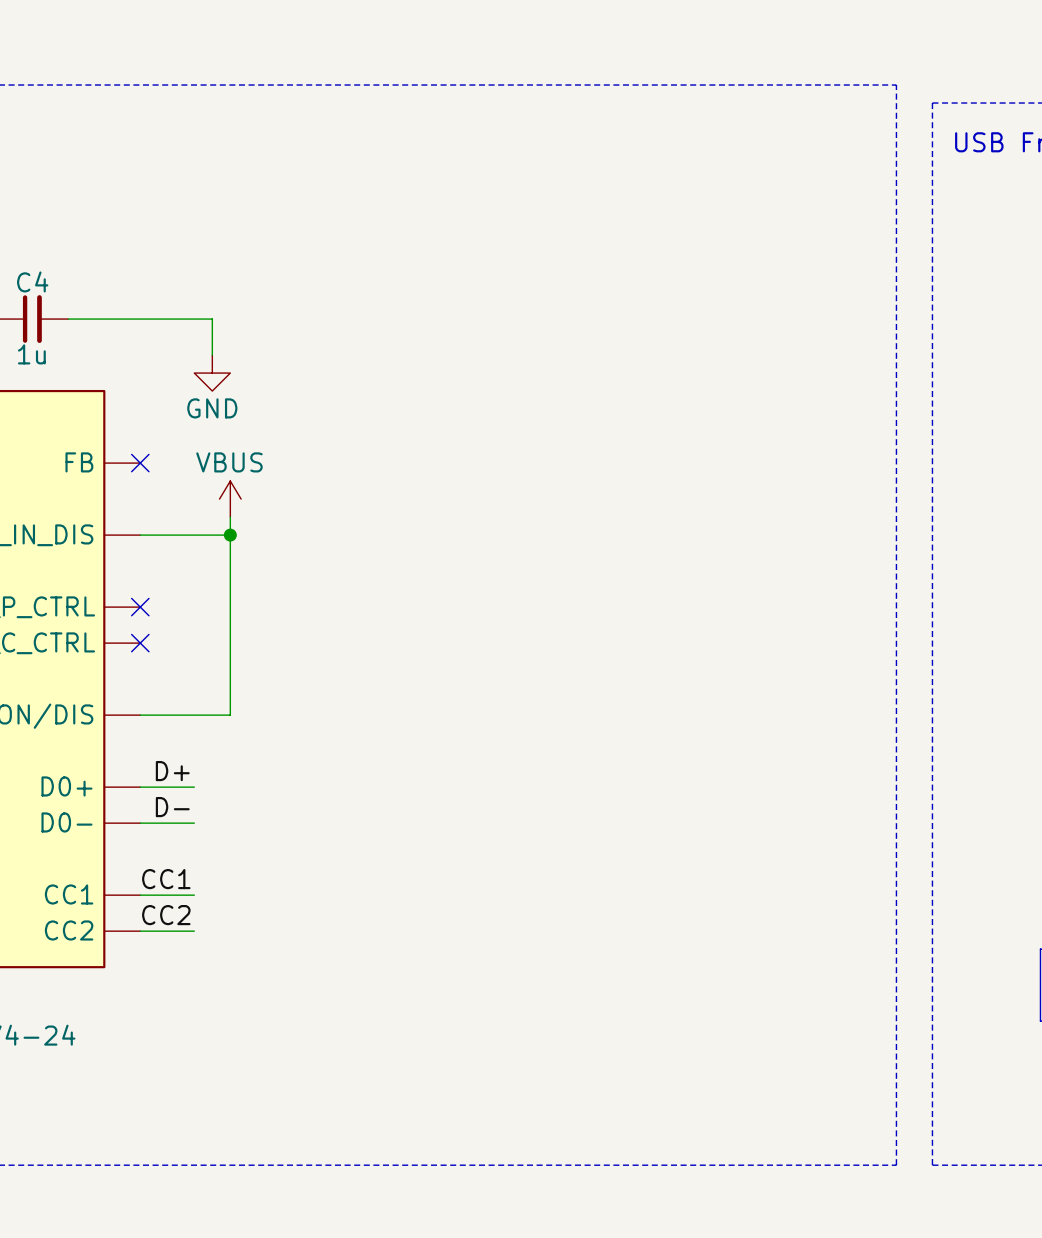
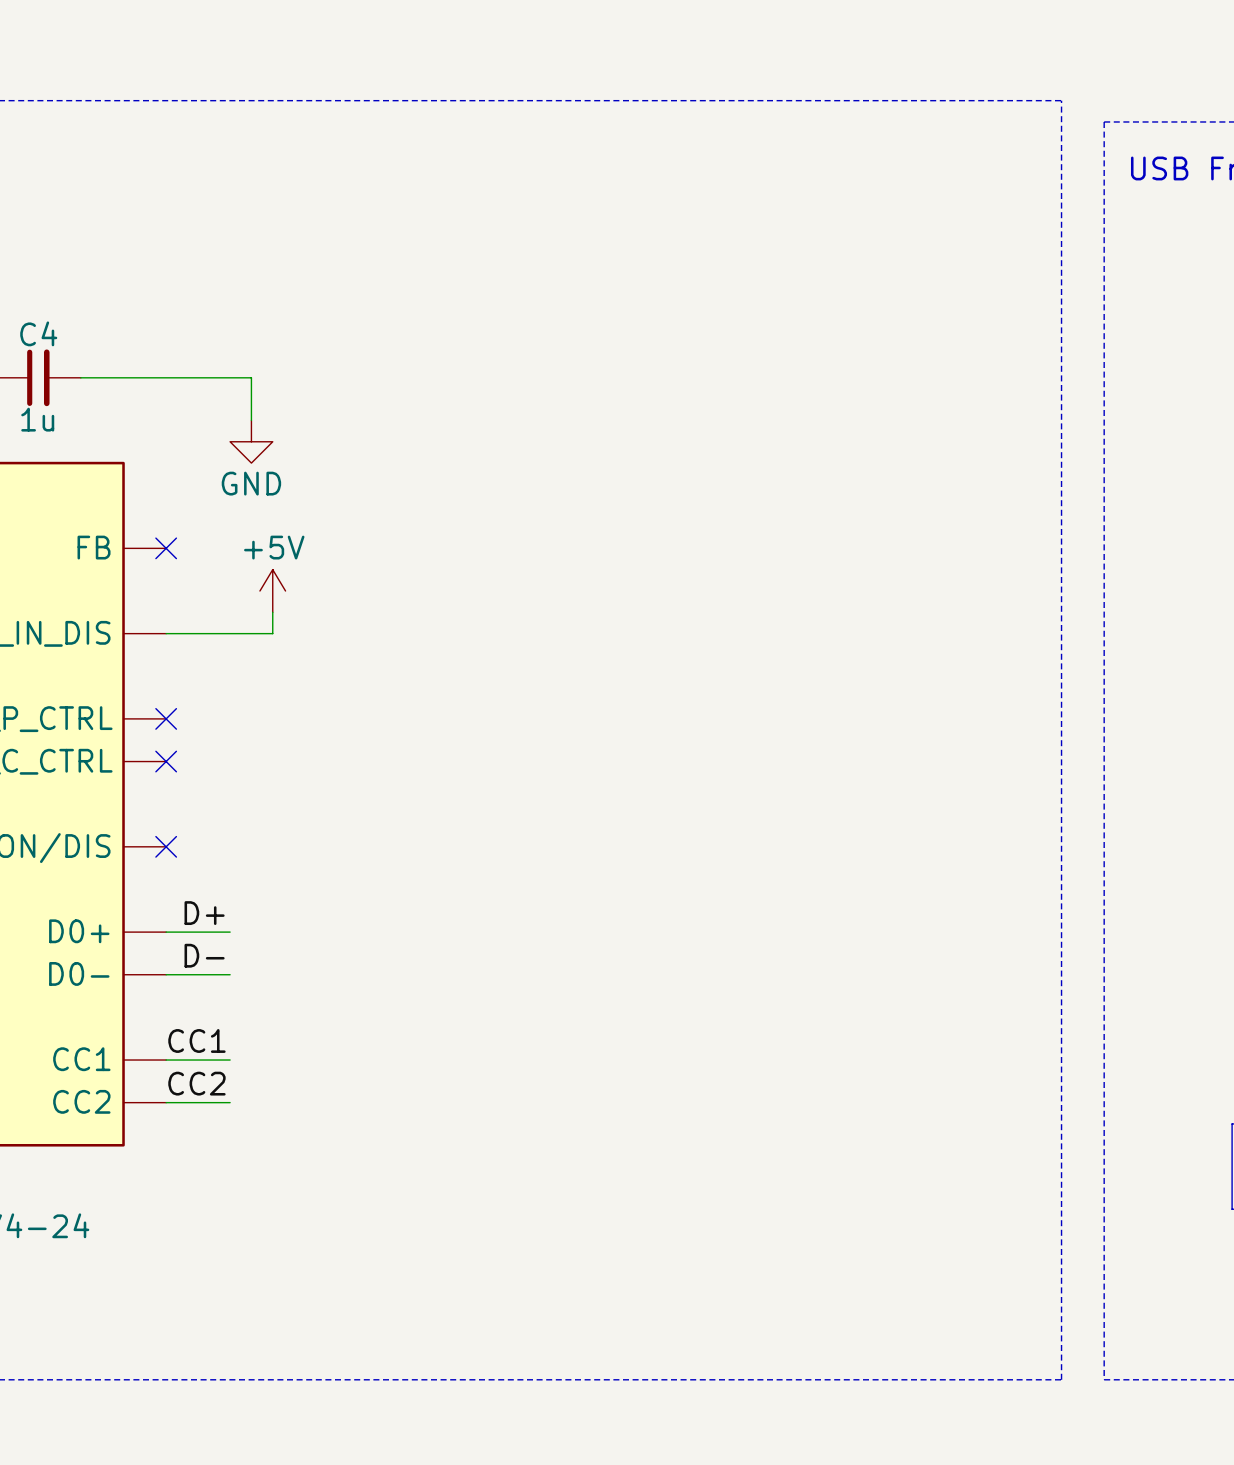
power symbol: VBUS (230, 499) -> +5V (272, 591)
wire: (230, 535) (230, 715) (140, 715) -> none
junction: (230, 535) -> none
no-connect mark: none -> (166, 846)

